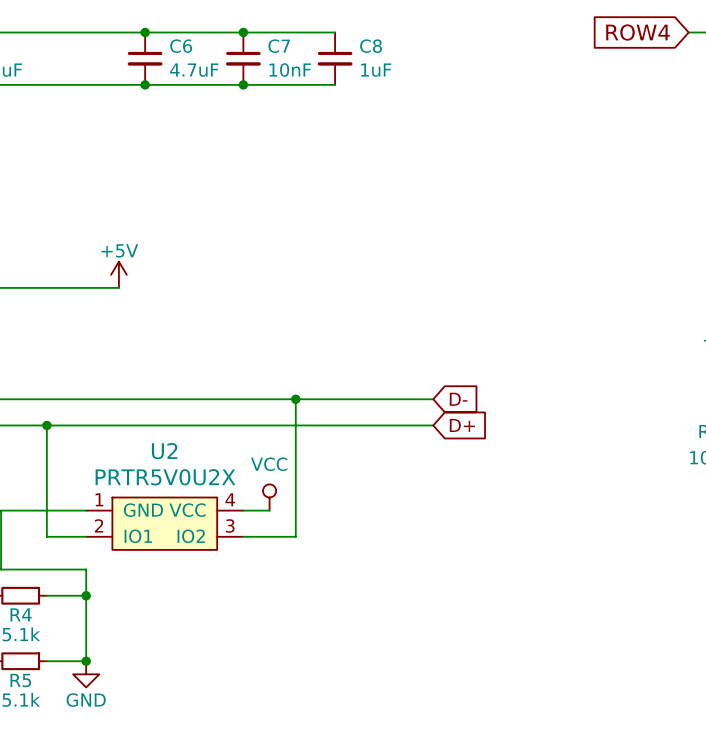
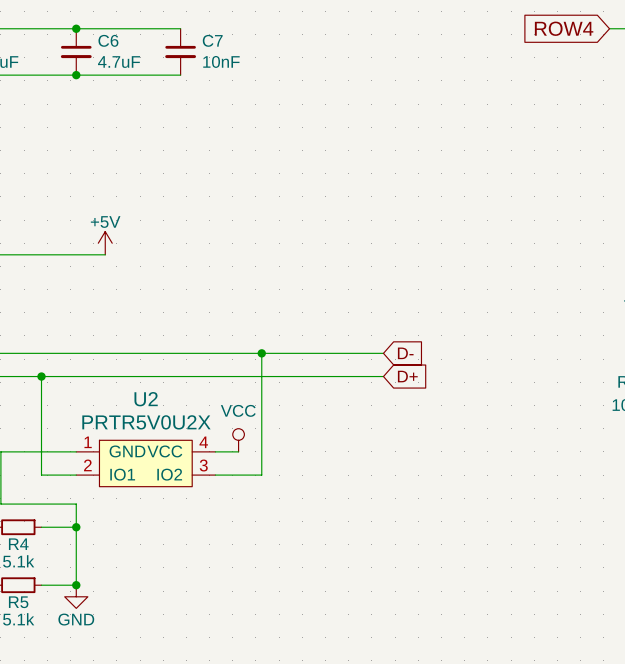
junction: none -> (76, 28)
junction: (145, 32) -> none
wire: (204, 32) (335, 32) -> none
junction: (243, 32) -> none
C6 position: (145, 58) -> (76, 51)
C7 position: (243, 58) -> (180, 51)
C8: 1uF (335, 58) -> none
junction: none -> (76, 75)
junction: (145, 84) -> none
wire: (204, 84) (335, 84) -> none
junction: (243, 84) -> none

